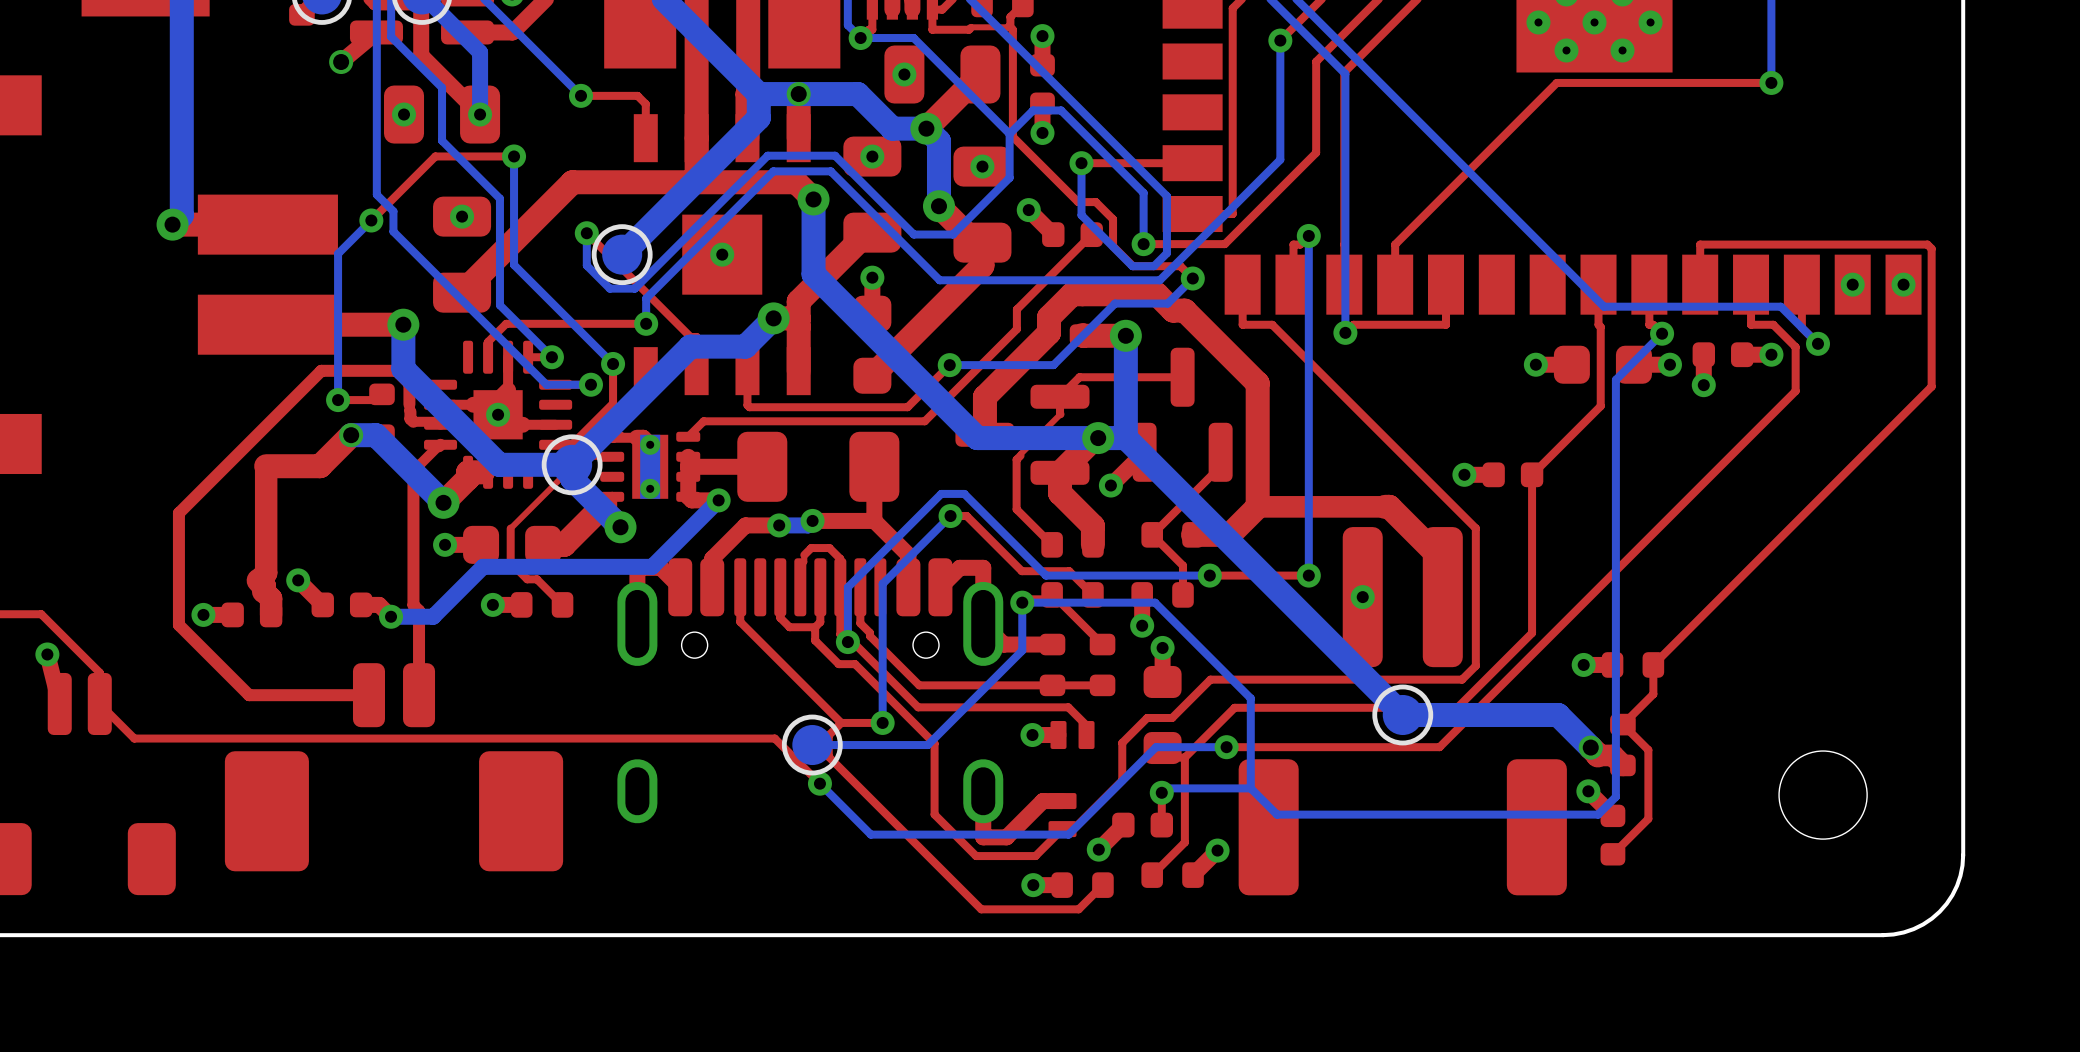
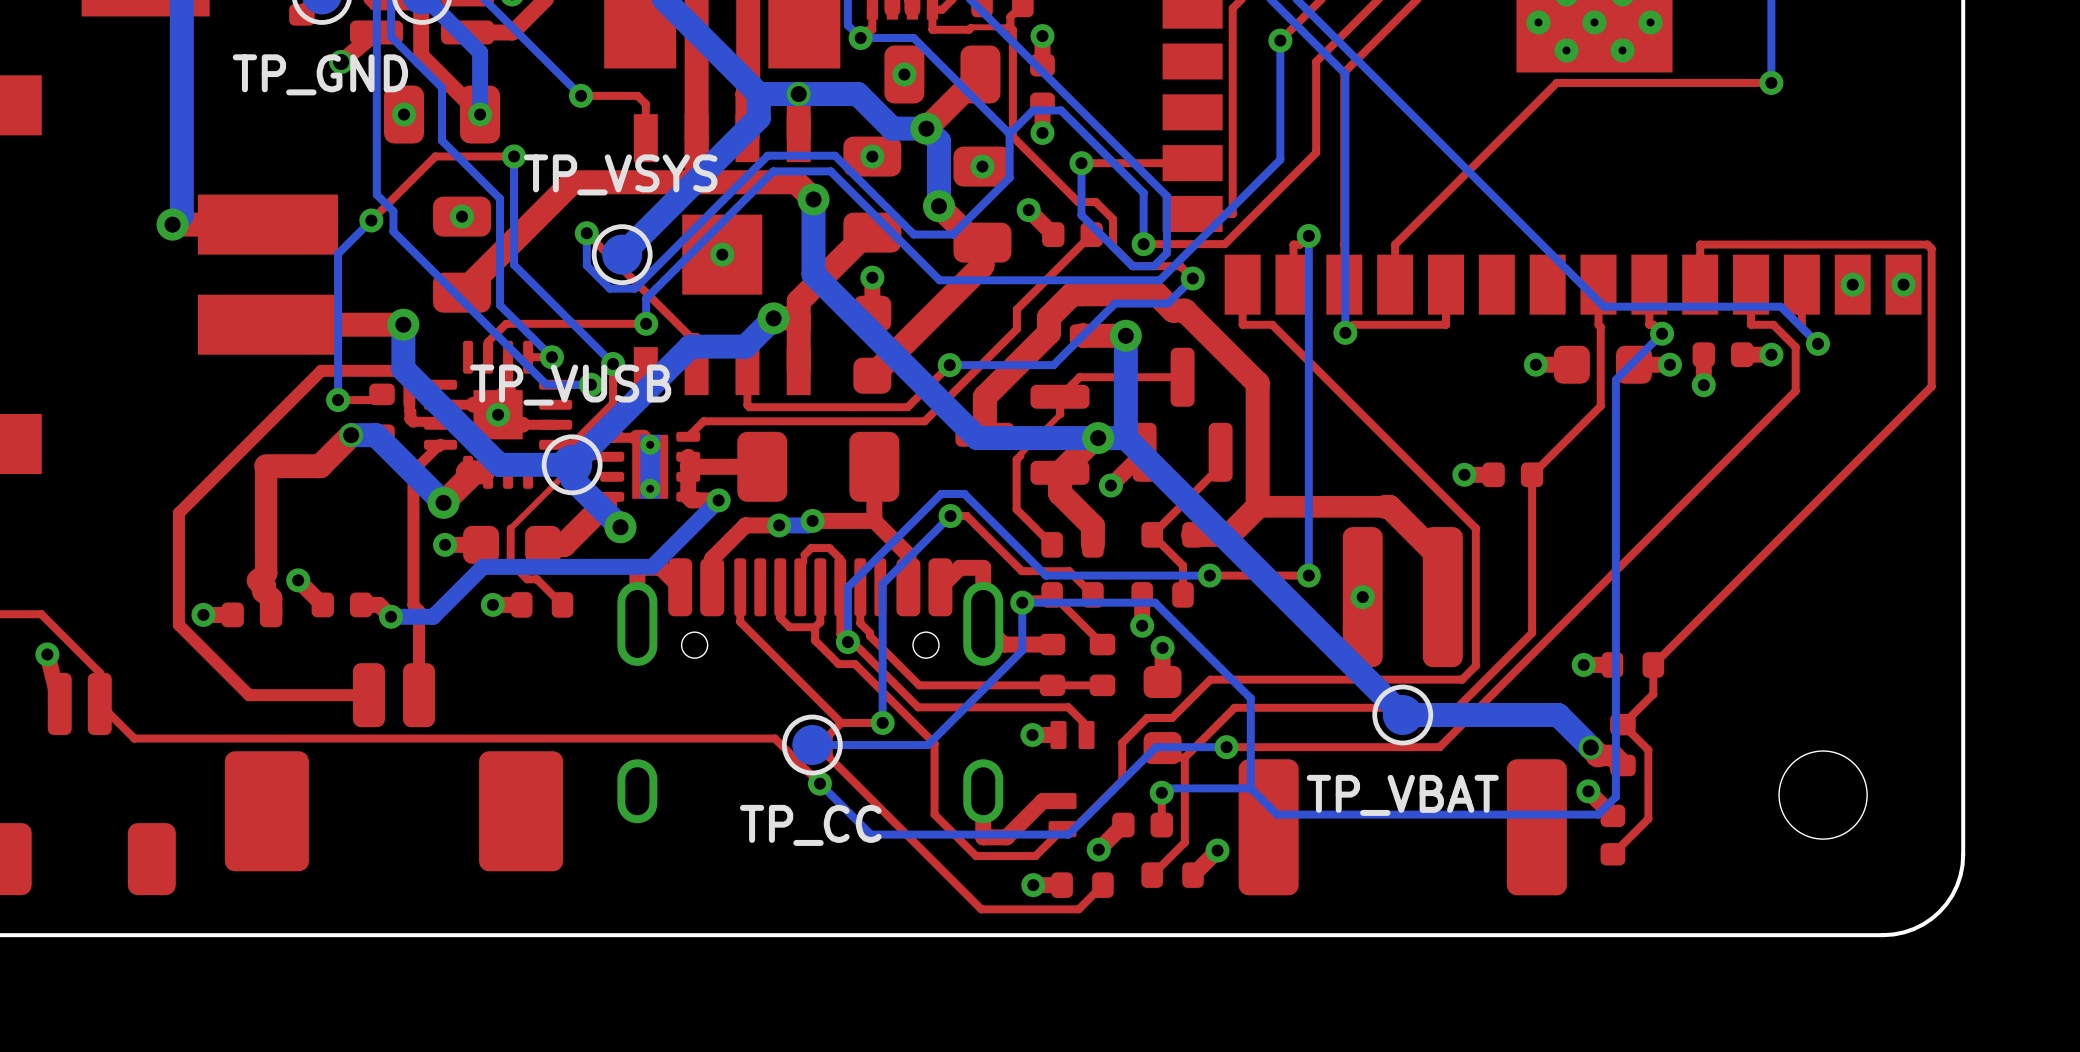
TP_GND name: none -> TP_GND (320, 74)
TP_VSYS name: none -> TP_VSYS (620, 174)
TP_VUSB name: none -> TP_VUSB (570, 385)
TP_VBAT name: none -> TP_VBAT (1402, 795)
TP_CC name: none -> TP_CC (810, 825)

